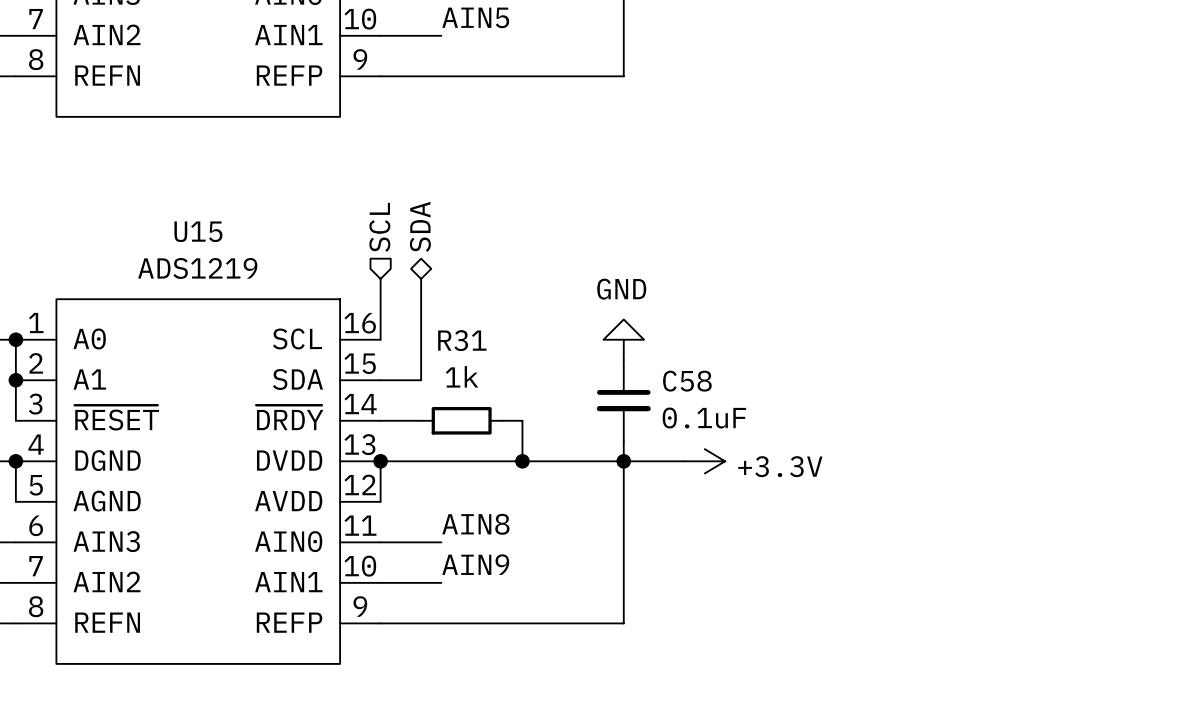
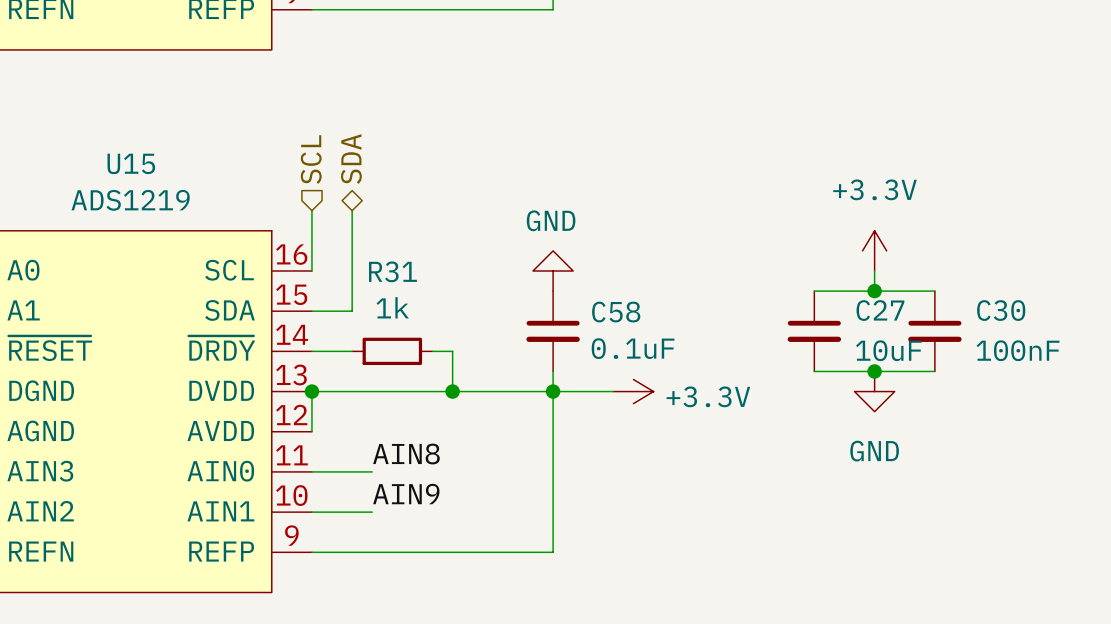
power symbol: none -> +3.3V (874, 250)
wire: none -> (874, 270) (874, 291)
wire: none -> (814, 291) (934, 291)
junction: none -> (874, 291)
C27: none -> 10uF (814, 331)
C30: none -> 100nF (934, 331)
wire: none -> (814, 371) (934, 371)
junction: none -> (874, 371)
power symbol: none -> GND (874, 391)

